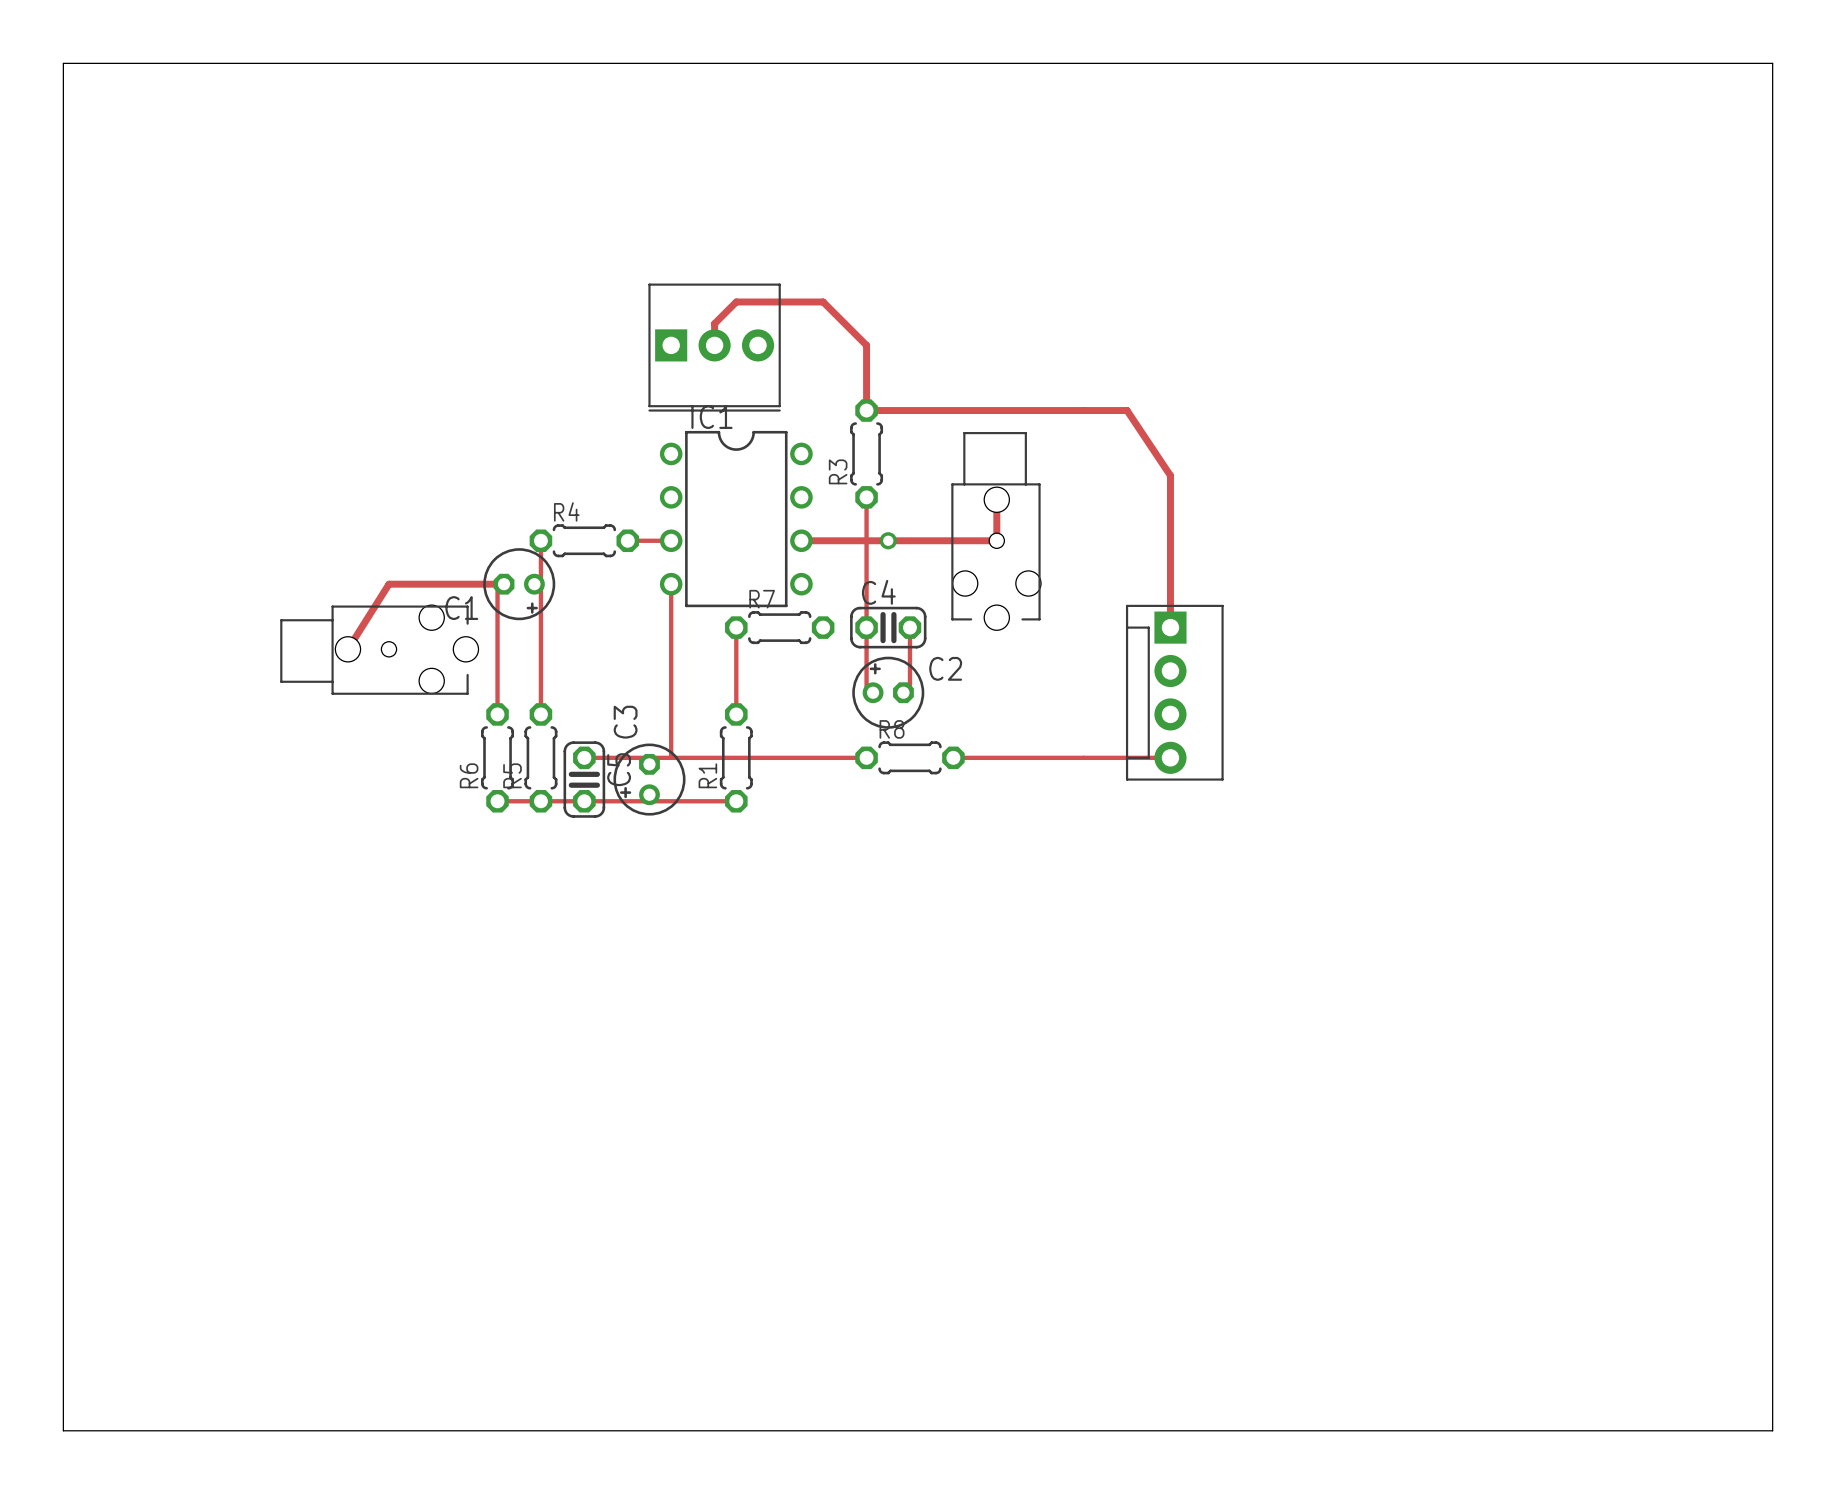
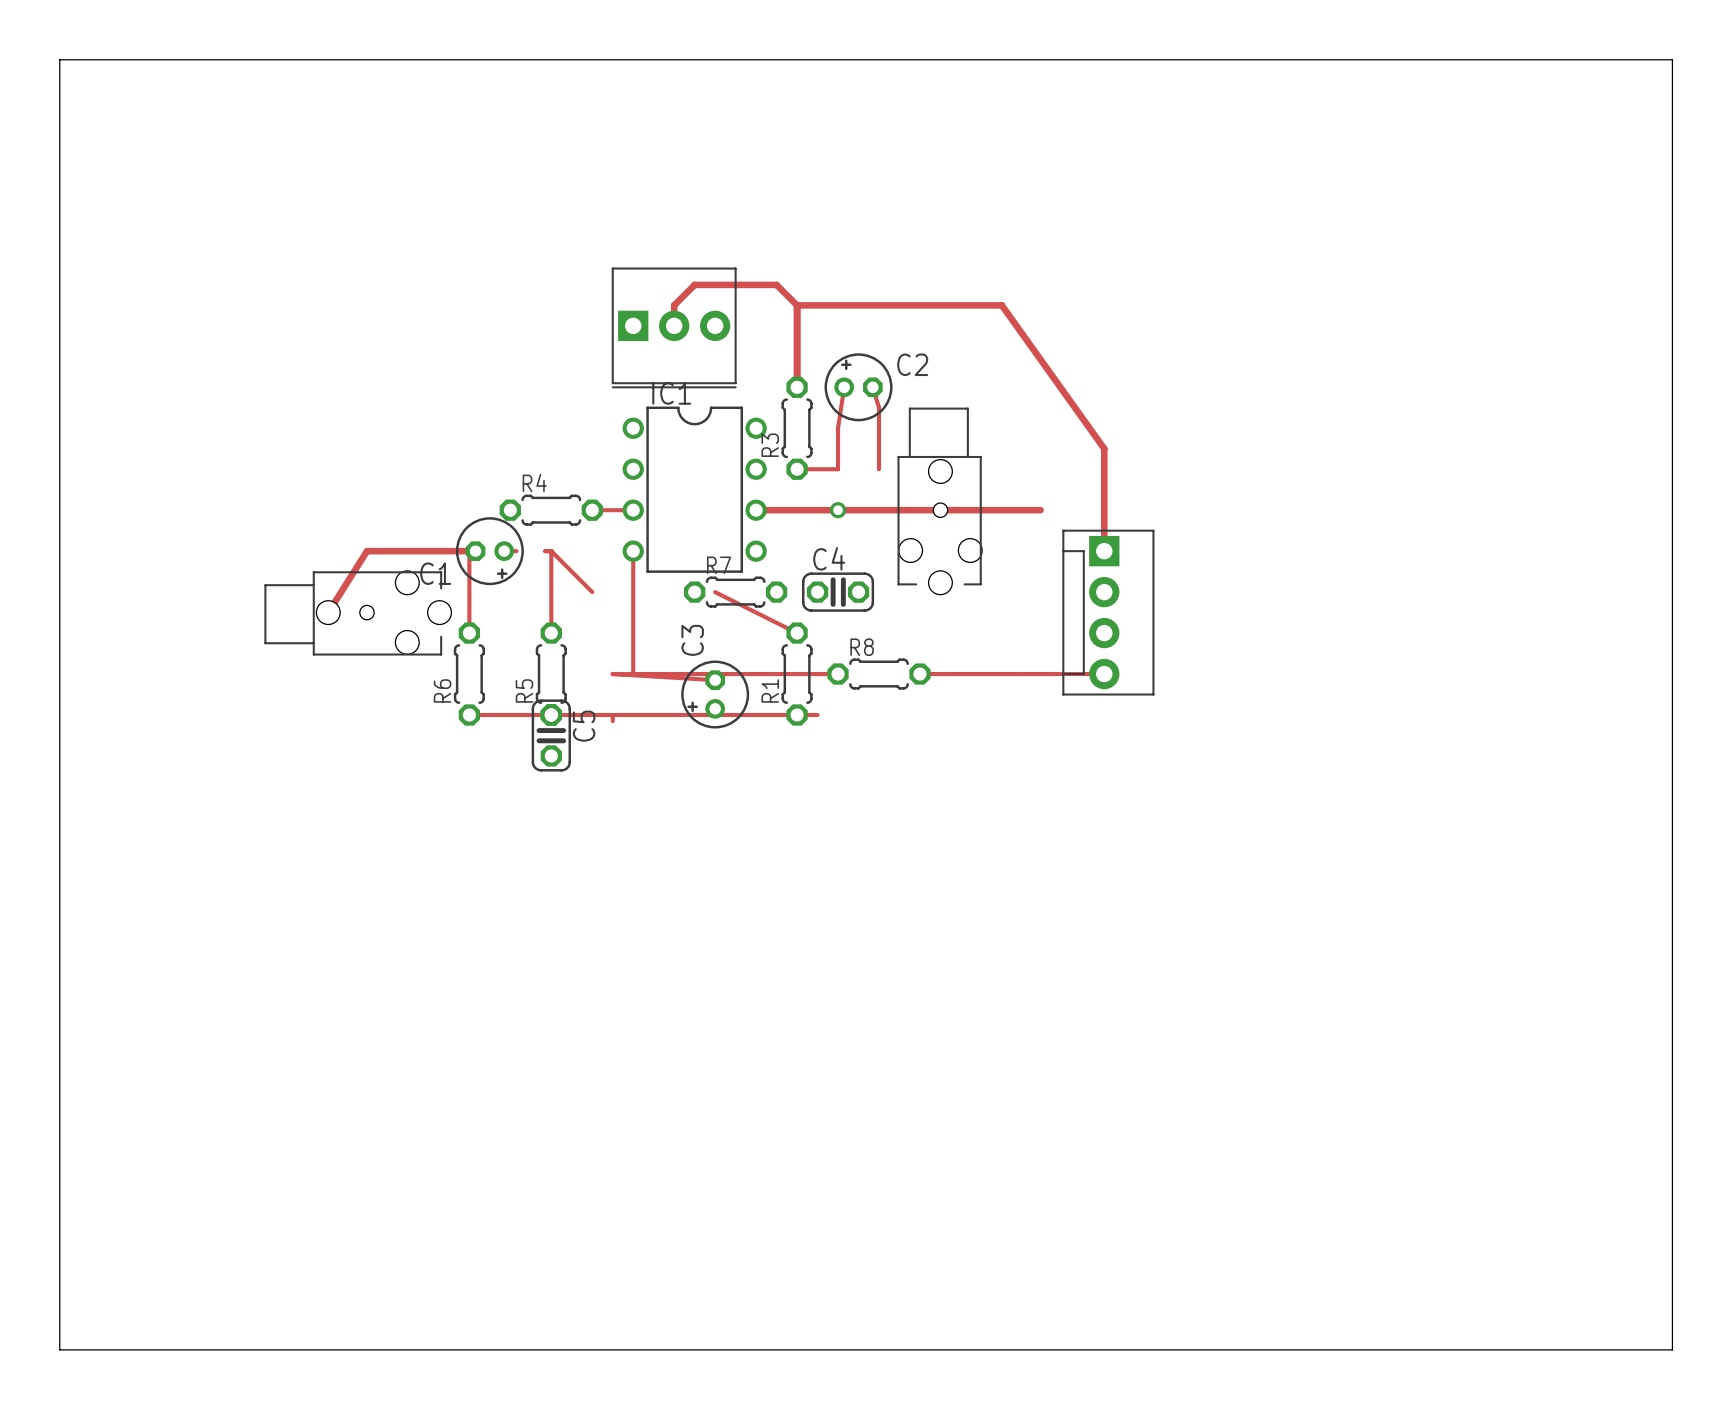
track: (844, 323) (866, 345) (866, 410) (1127, 410) (1170, 475) -> (797, 387) (797, 305) (1001, 305) (1104, 448)
track: none -> (844, 387) (838, 428) (838, 469) (797, 469)
track: none -> (872, 387) (879, 407) (879, 469)
R3 position: (866, 453) -> (797, 428)
track: (866, 497) (866, 692) (873, 692) -> none
track: (996, 499) (996, 540) -> (1040, 510) (940, 510)
track: (540, 540) (540, 714) -> none
track: none -> (510, 551) (516, 551)
track: none -> (545, 551) (551, 551)
track: none -> (551, 551) (592, 592)
track: (1170, 584) (1170, 627) -> none
track: (736, 627) (736, 714) -> (551, 551) (551, 633)
track: none -> (715, 592) (797, 633)
track: (909, 627) (909, 692) (903, 692) -> none
track: (497, 671) (497, 714) -> none
C2 position: (888, 692) -> (858, 387)
part position: (1174, 692) -> (1108, 612)
track: (671, 714) (671, 757) -> none
track: none -> (838, 674) (612, 674) (715, 680)
track: none -> (919, 674) (1104, 674)
track: none -> (469, 715) (551, 715)
R6 position: (497, 757) -> (469, 674)
R5 position: (540, 757) -> (551, 674)
R1 position: (736, 757) -> (797, 674)
R8 position: (909, 757) -> (879, 674)
track: (953, 757) (1170, 757) -> none
C3 position: (649, 779) -> (715, 694)
track: (497, 801) (736, 801) -> none

